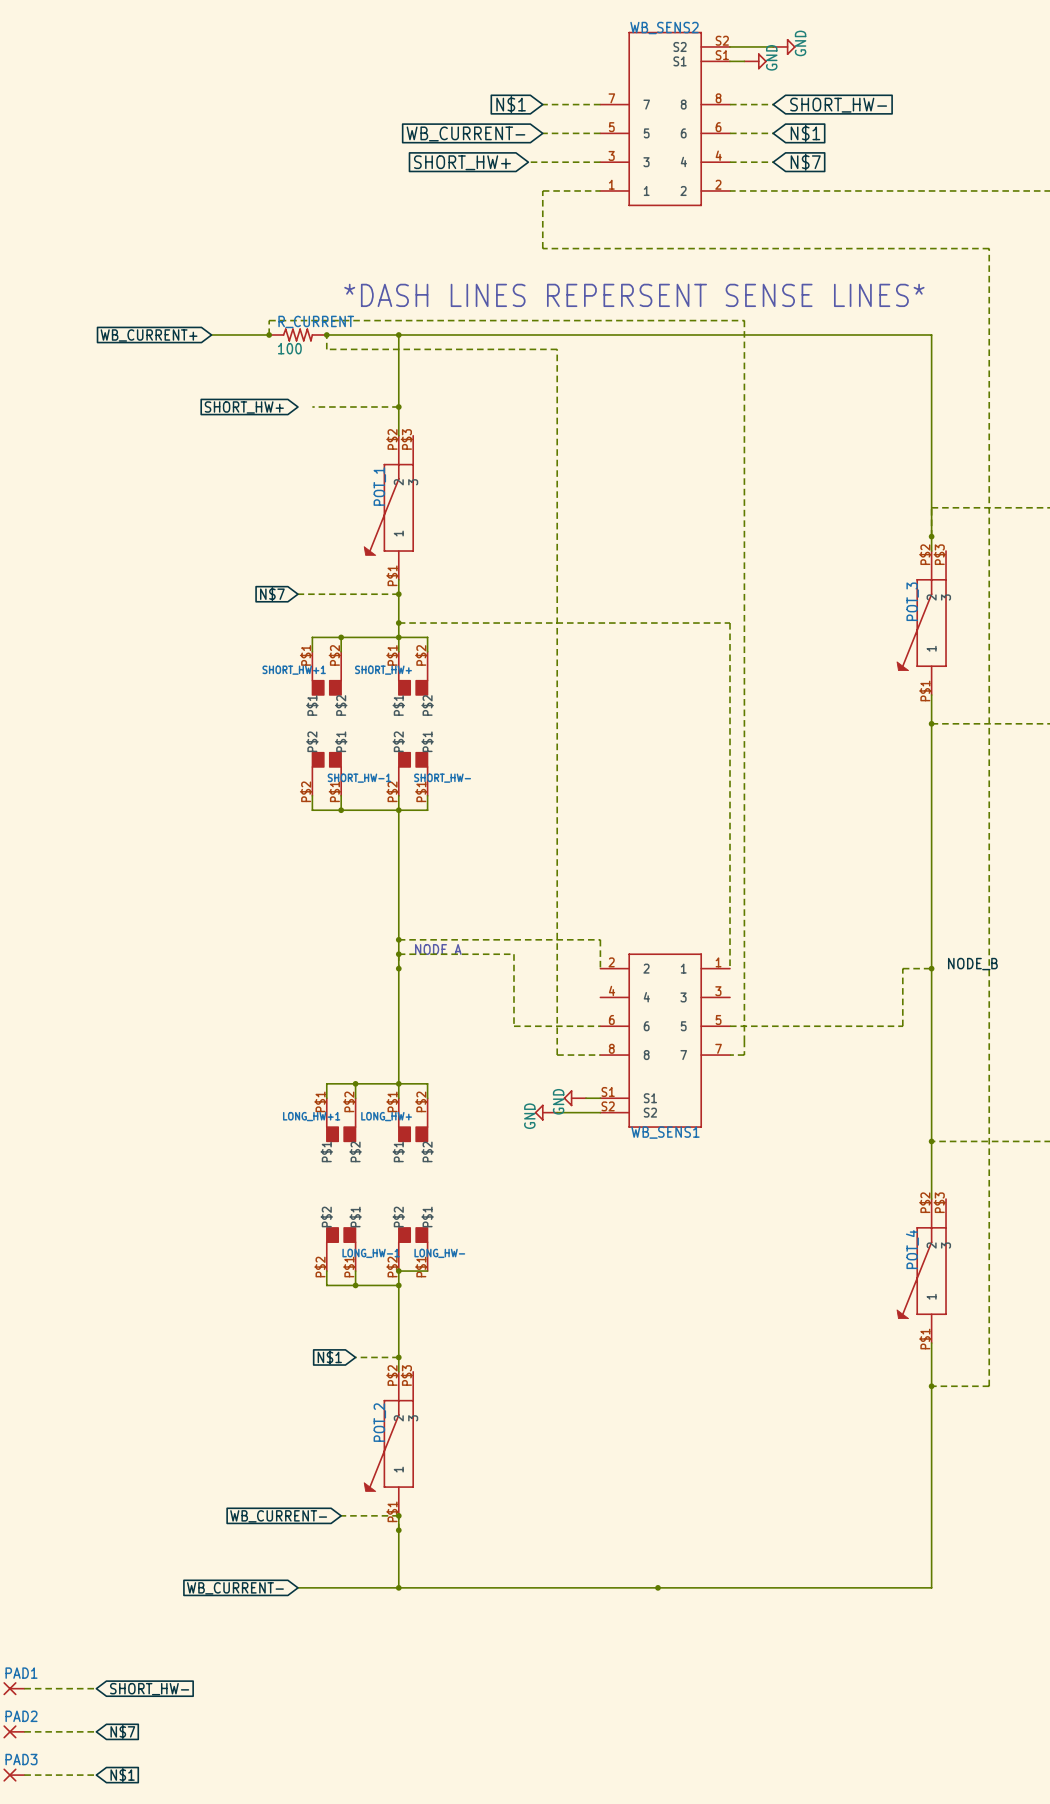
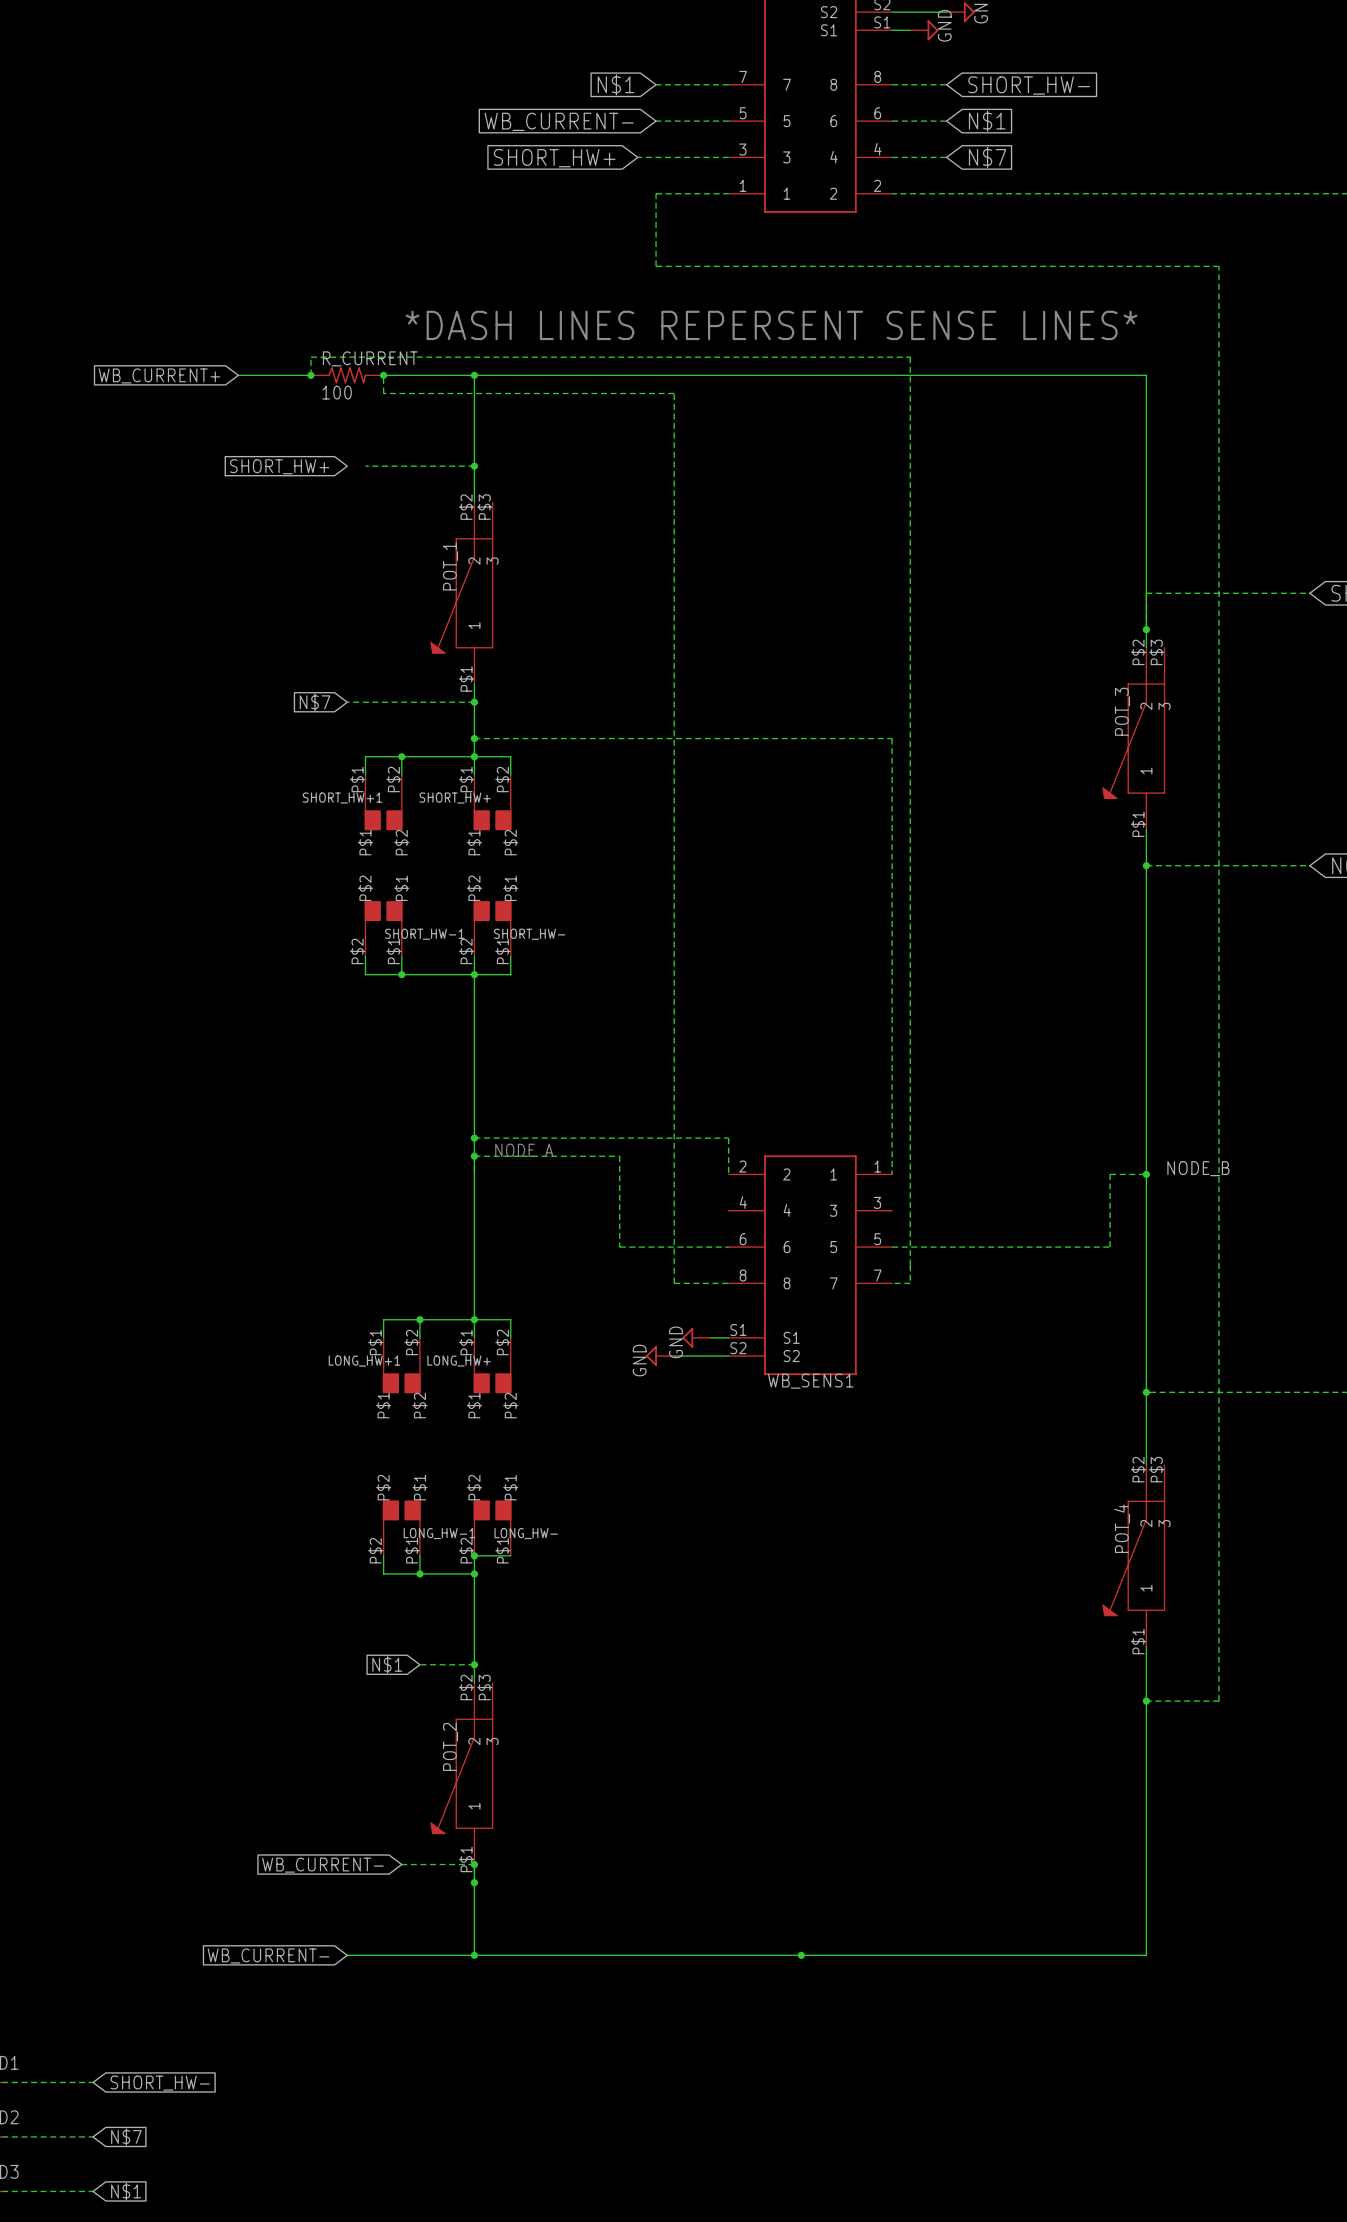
junction: (398, 968) -> none

